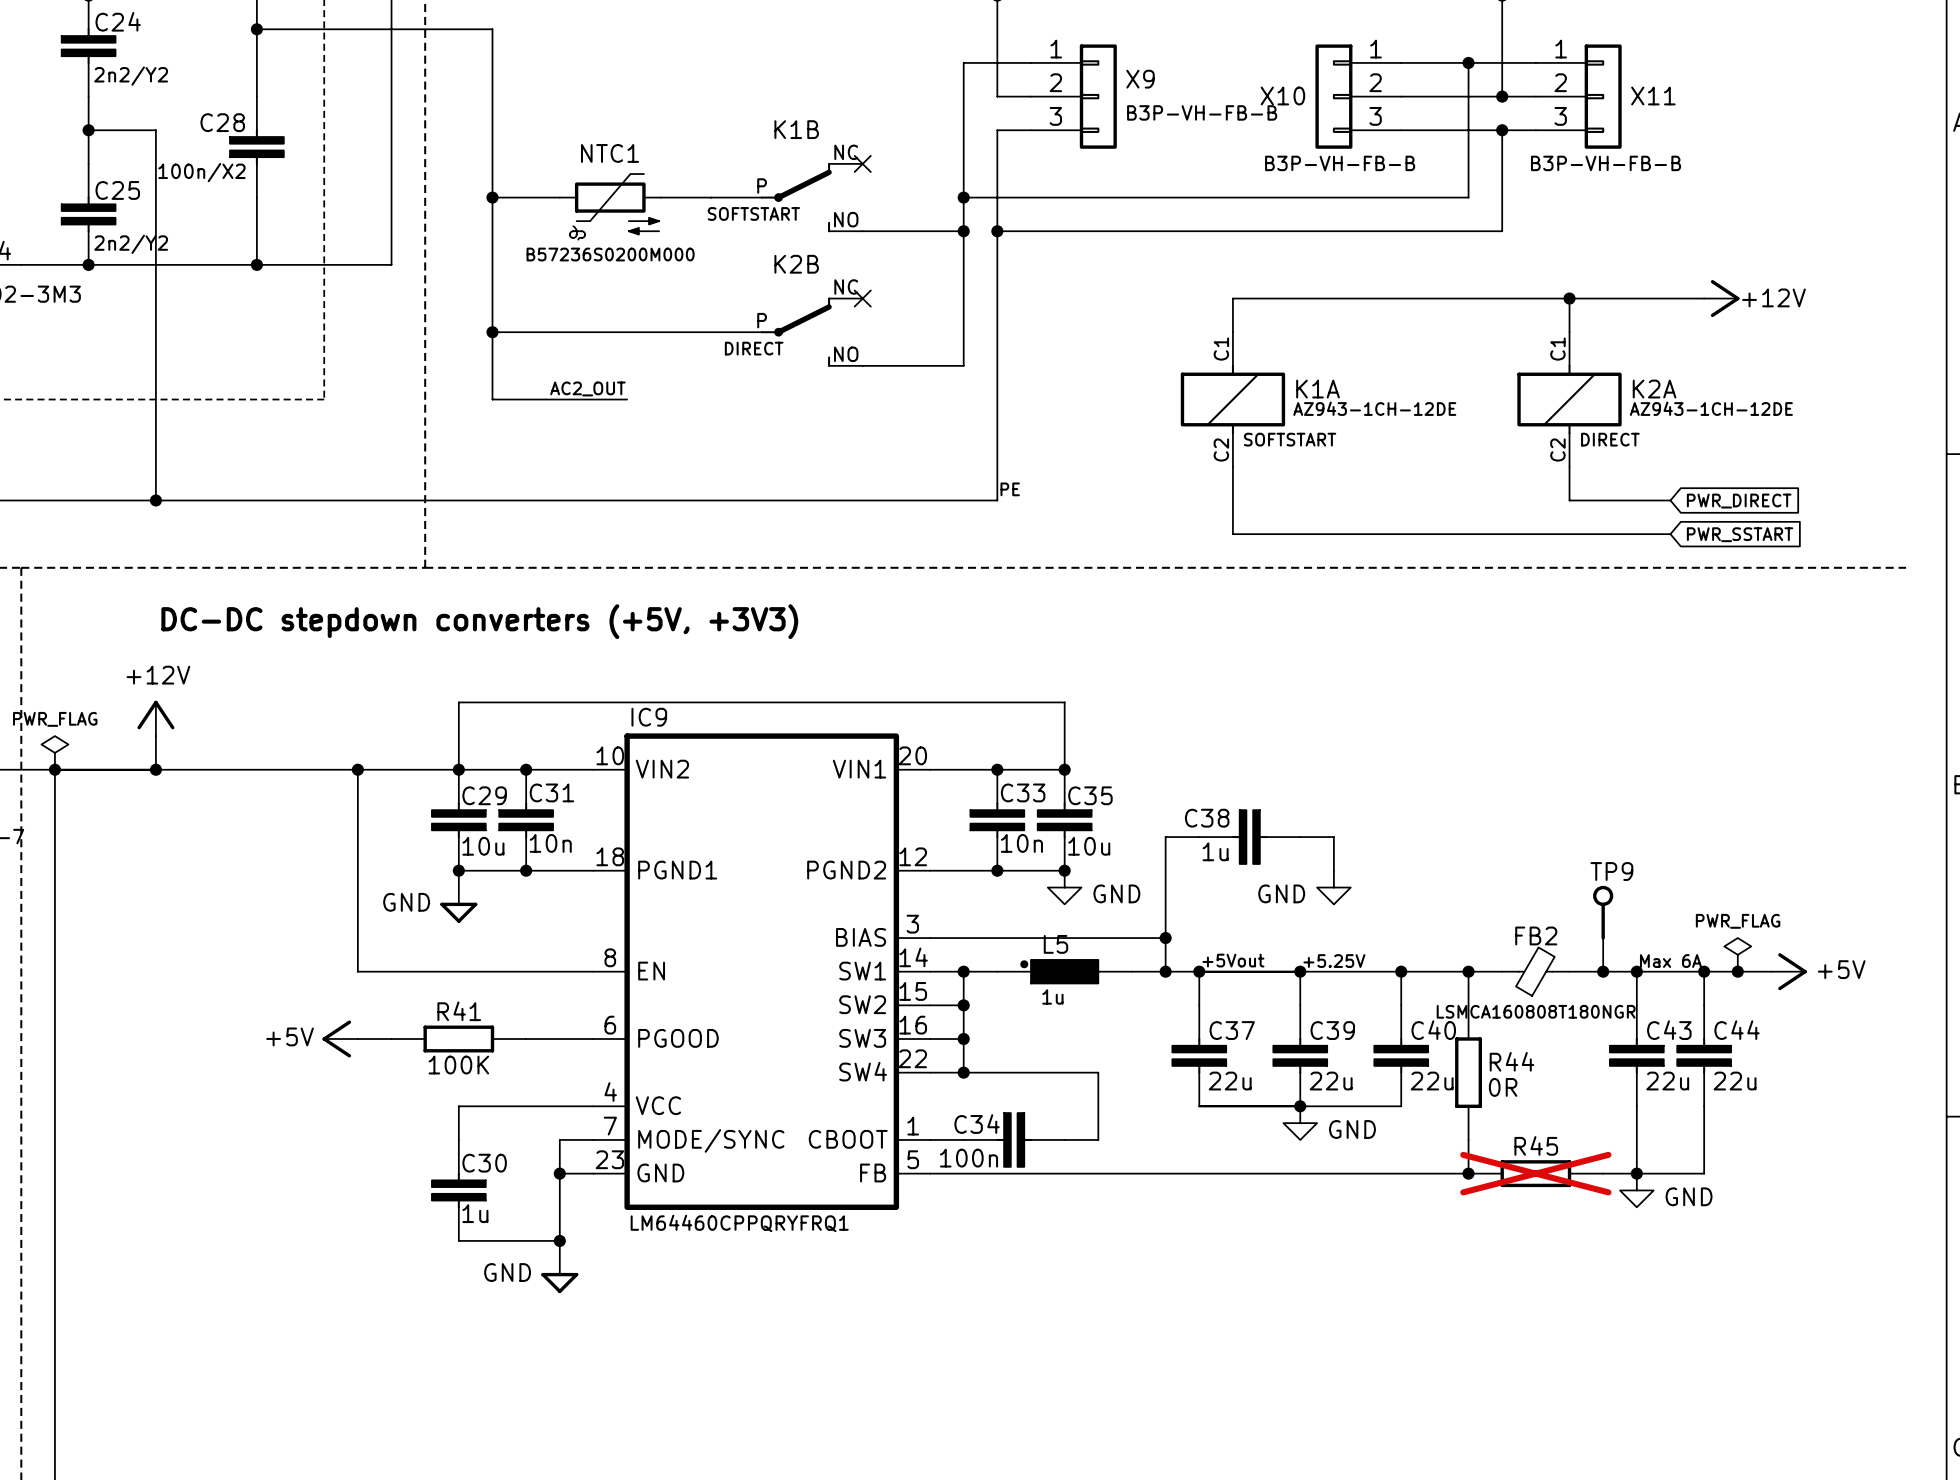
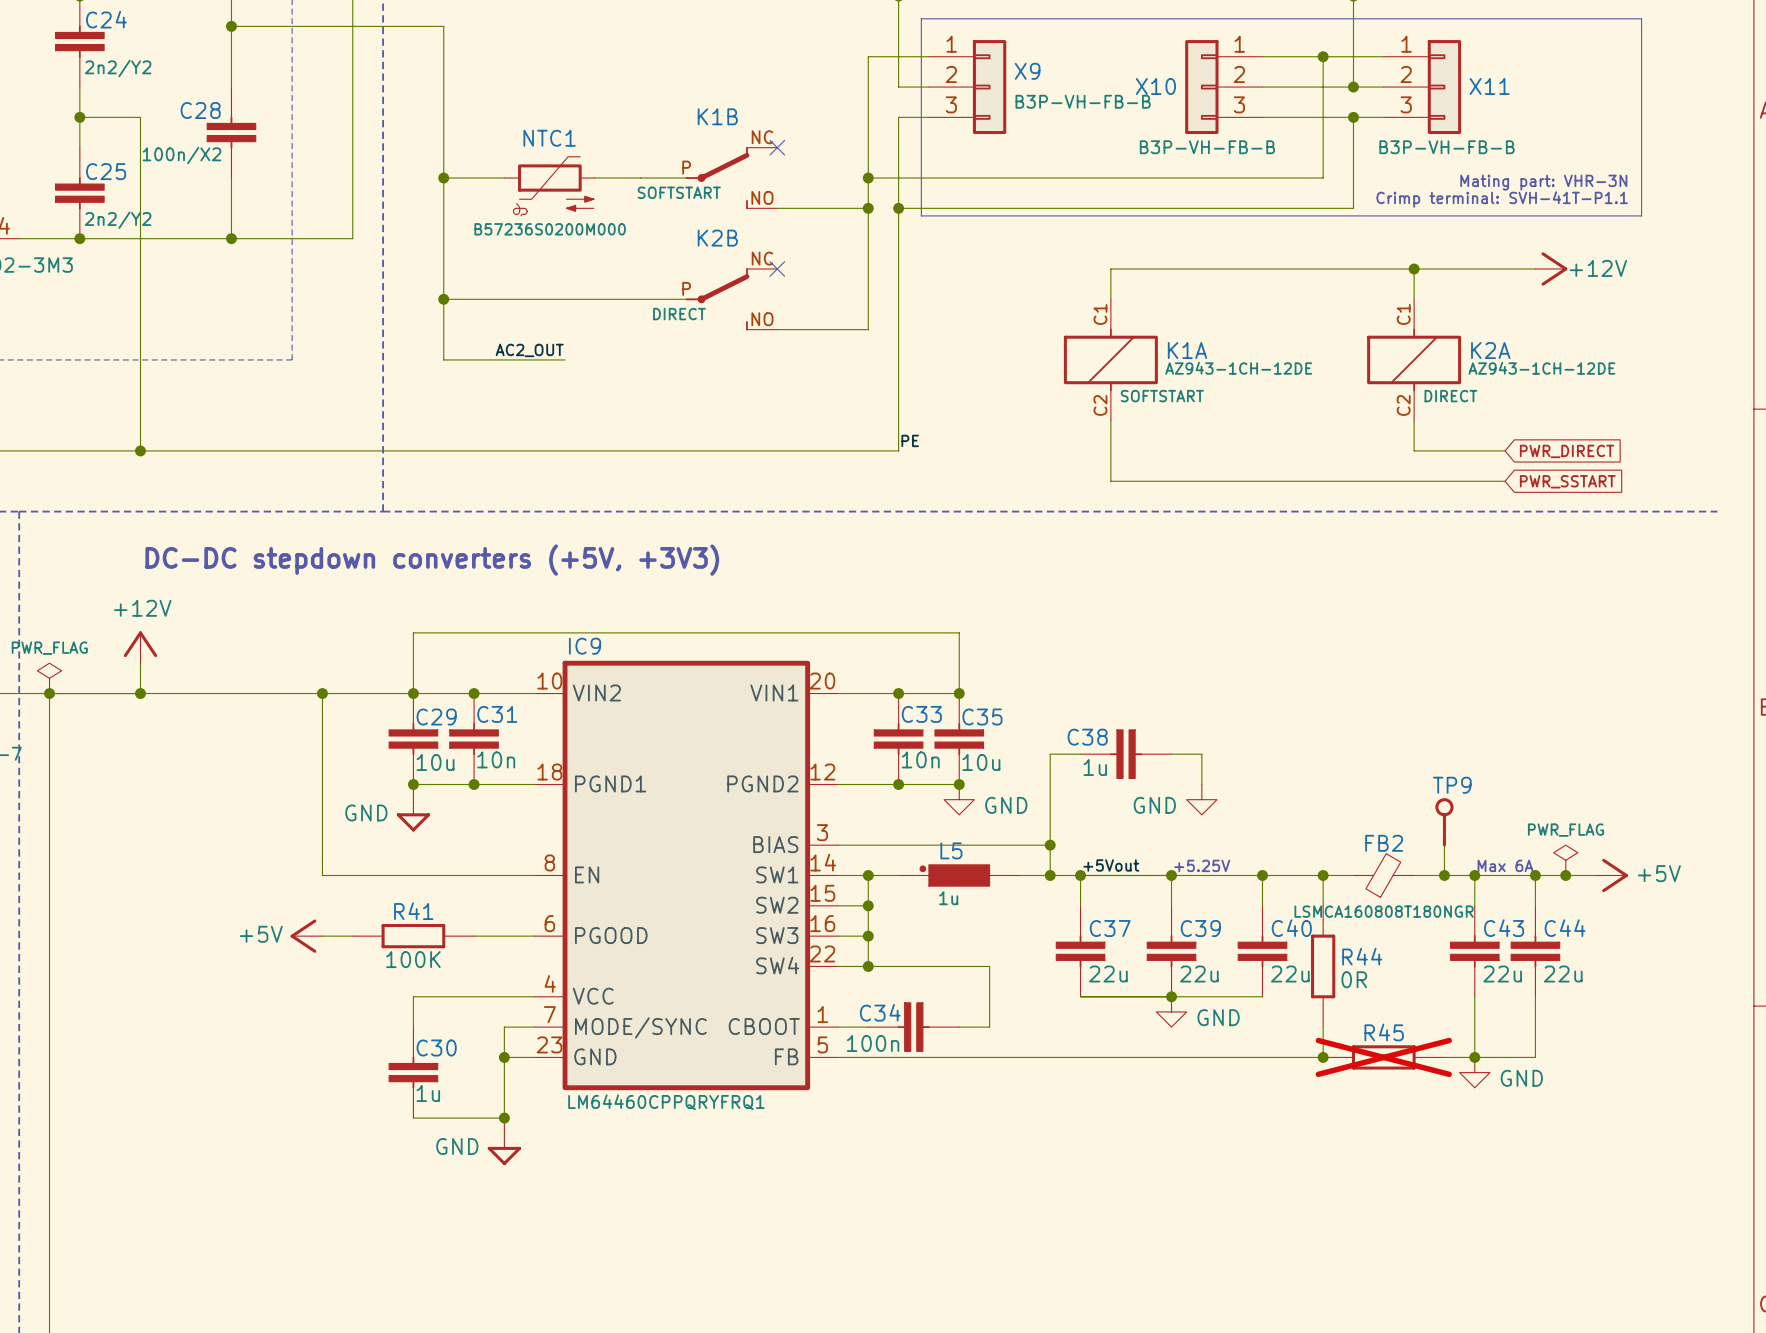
line: none -> (921, 18) (1641, 18) (1641, 215) (921, 215) (921, 18)
text: none -> Mating part: VHR-3N (1543, 182)
text: none -> Crimp terminal: SVH-41T-P1.1 (1502, 199)

